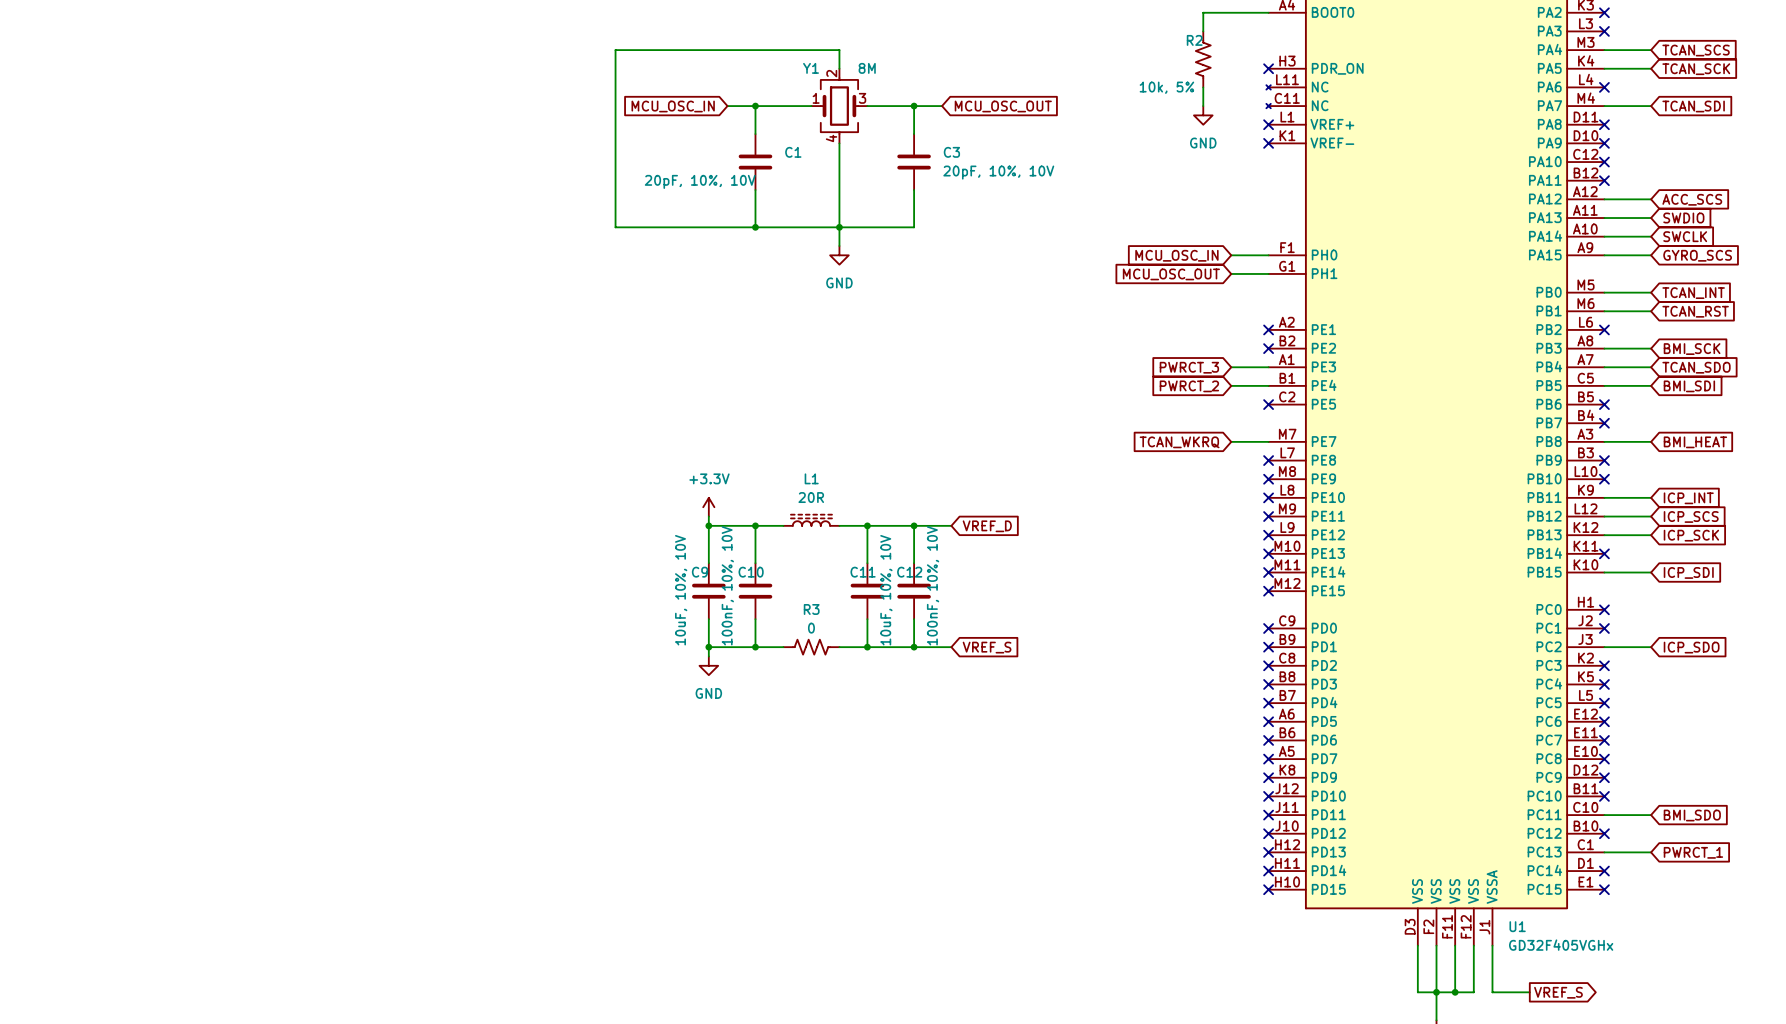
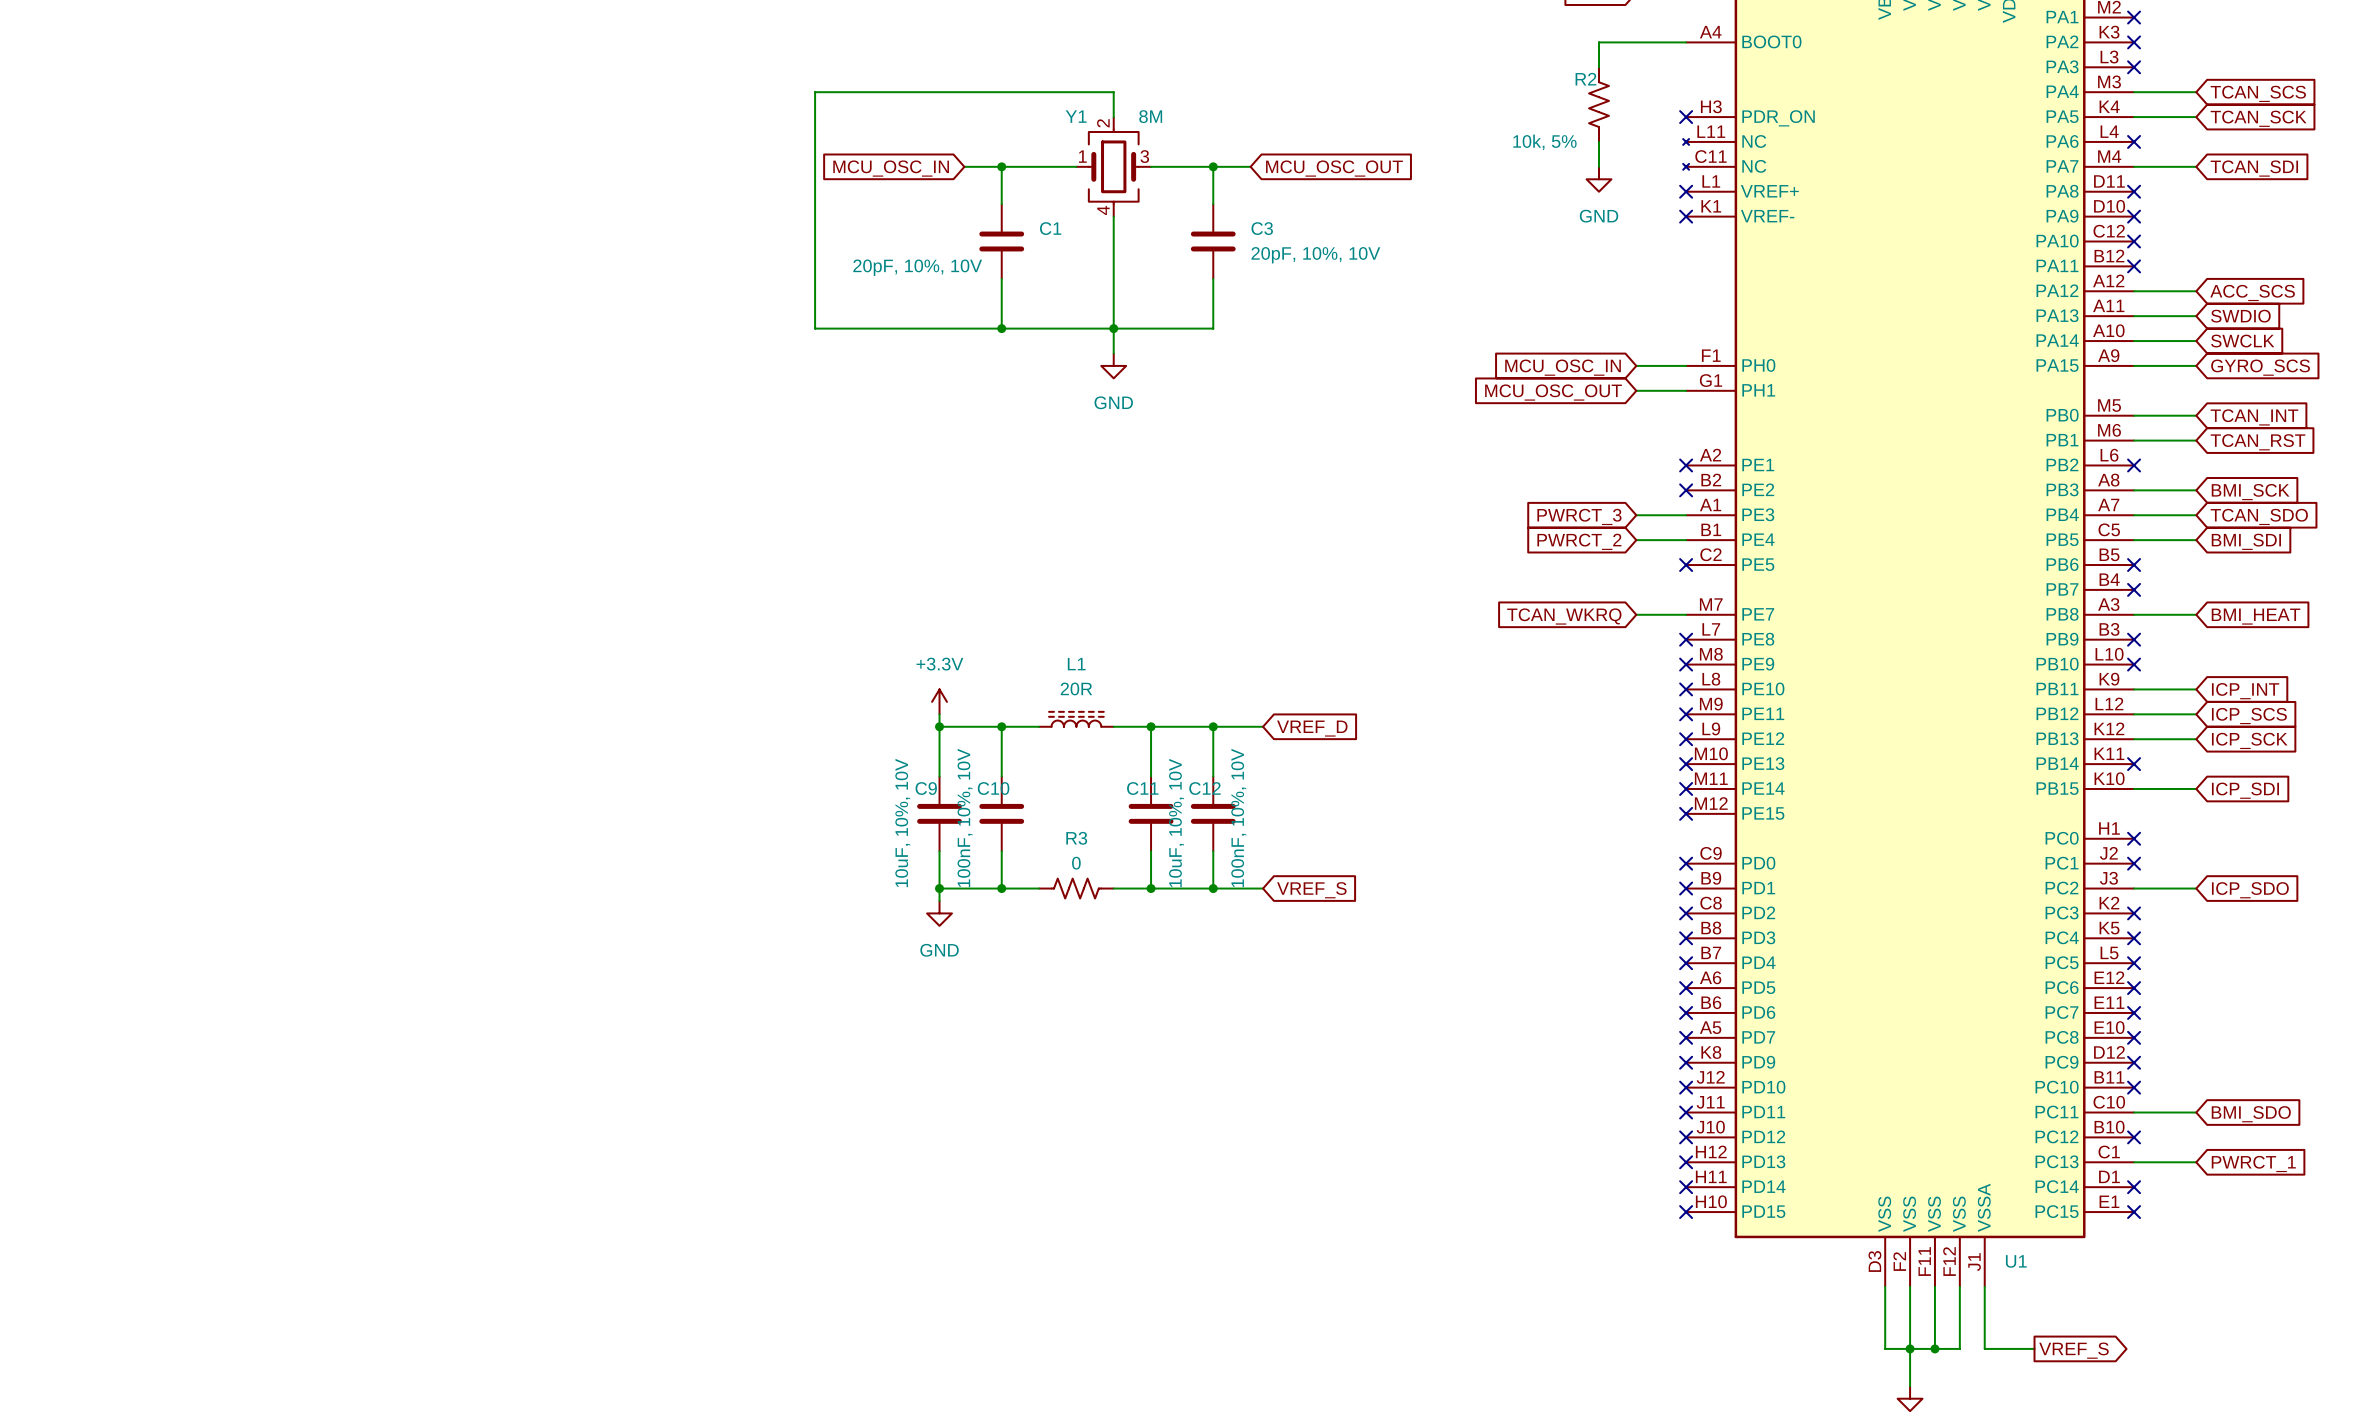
U1 value: GD32F405VGHx (1561, 945) -> none

